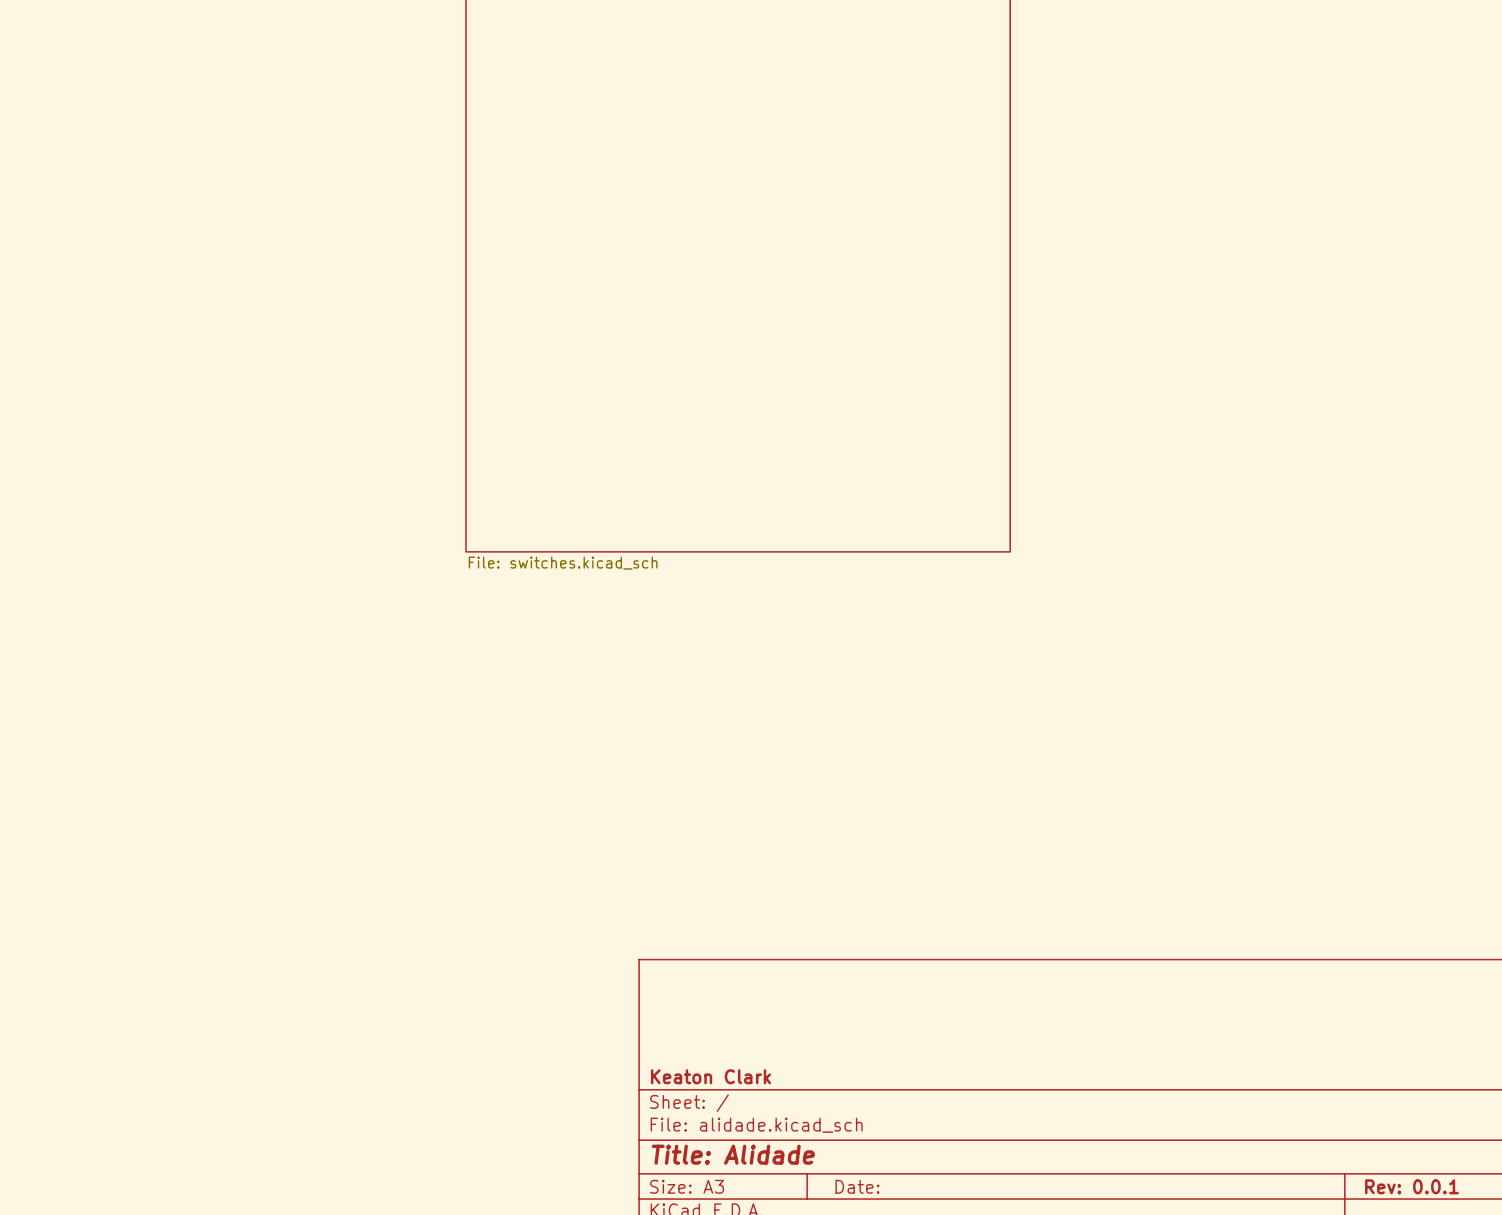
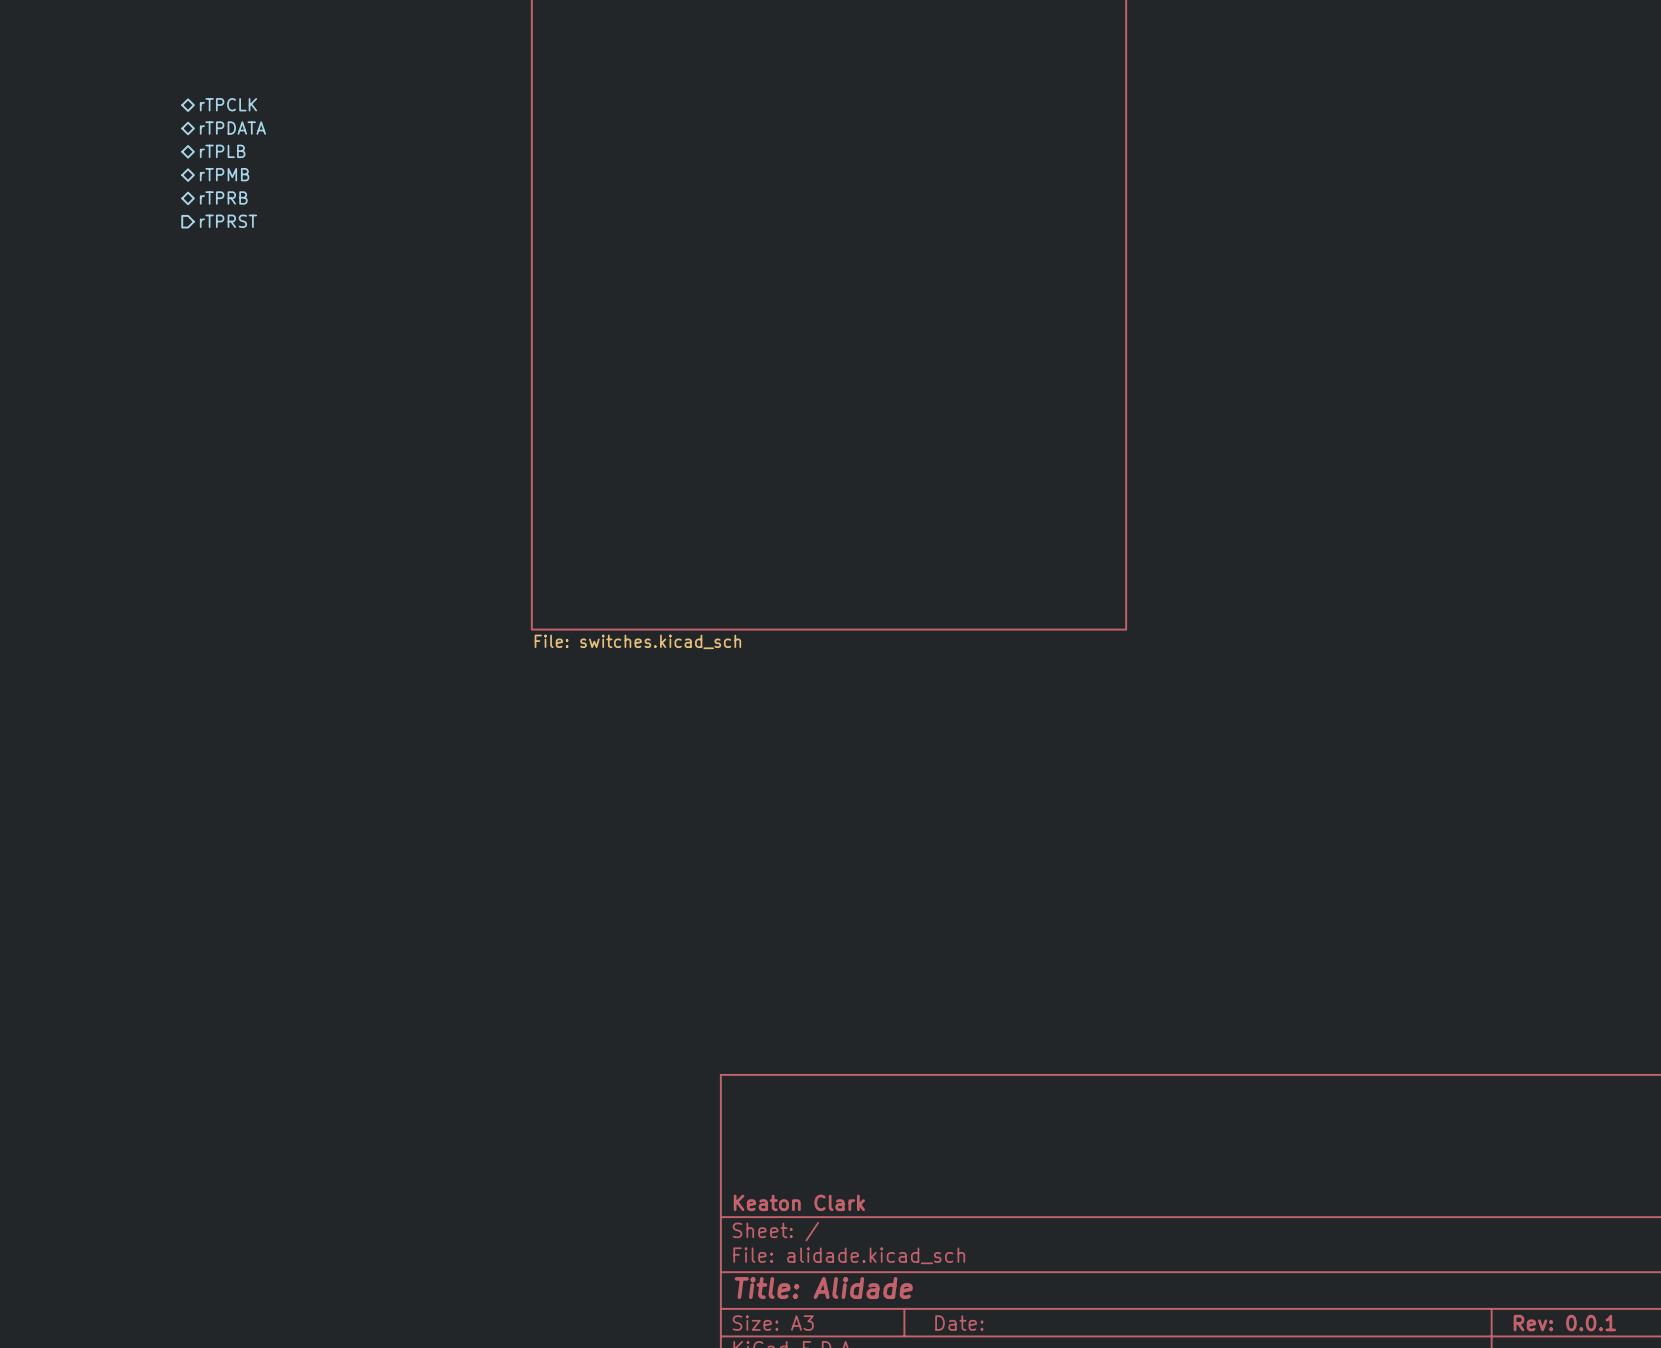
sheet pin: none -> rTPCLK (228, 104)
sheet pin: none -> rTPDATA (232, 128)
sheet pin: none -> rTPLB (222, 151)
sheet pin: none -> rTPMB (224, 174)
sheet pin: none -> rTPRB (223, 197)
sheet pin: none -> rTPRST (228, 221)

